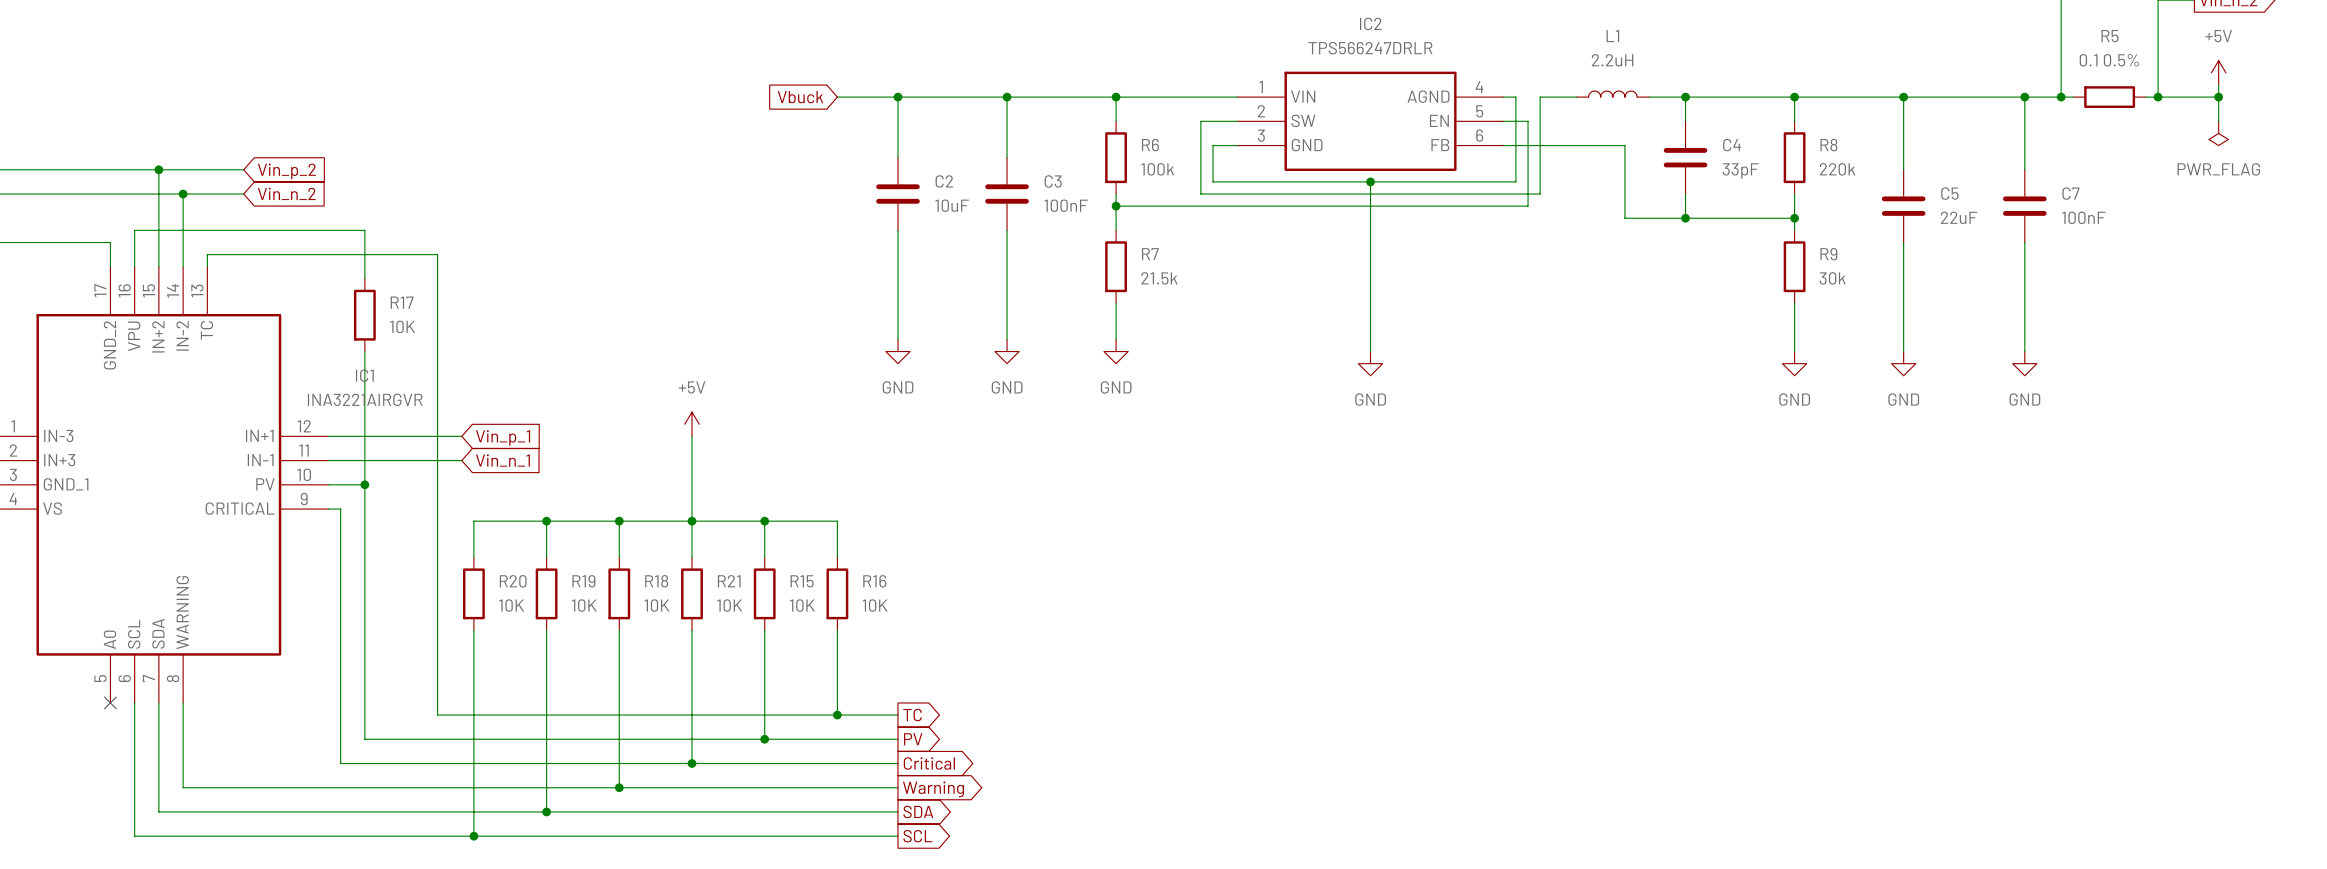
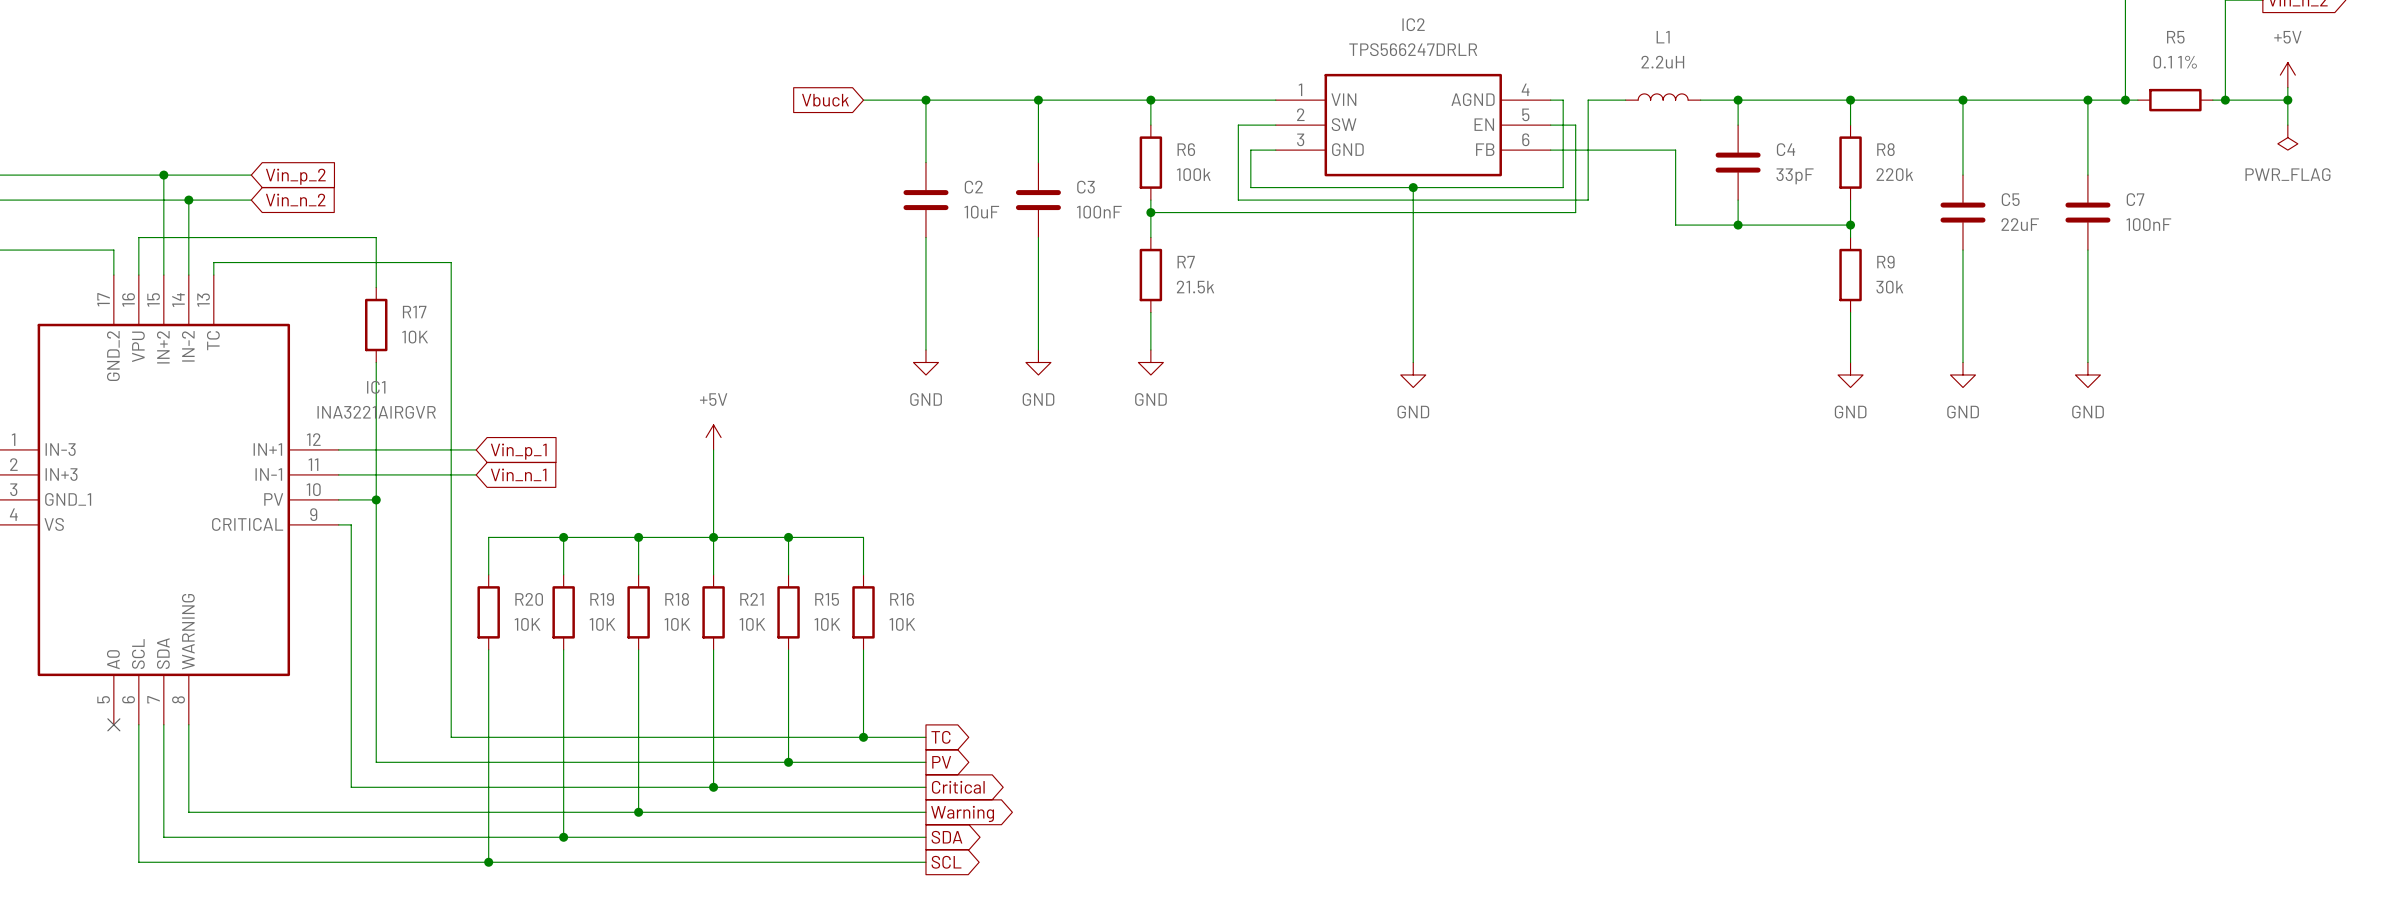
R5 value: 0.1 0.5% (2109, 60) -> 0.1 1% (2175, 62)

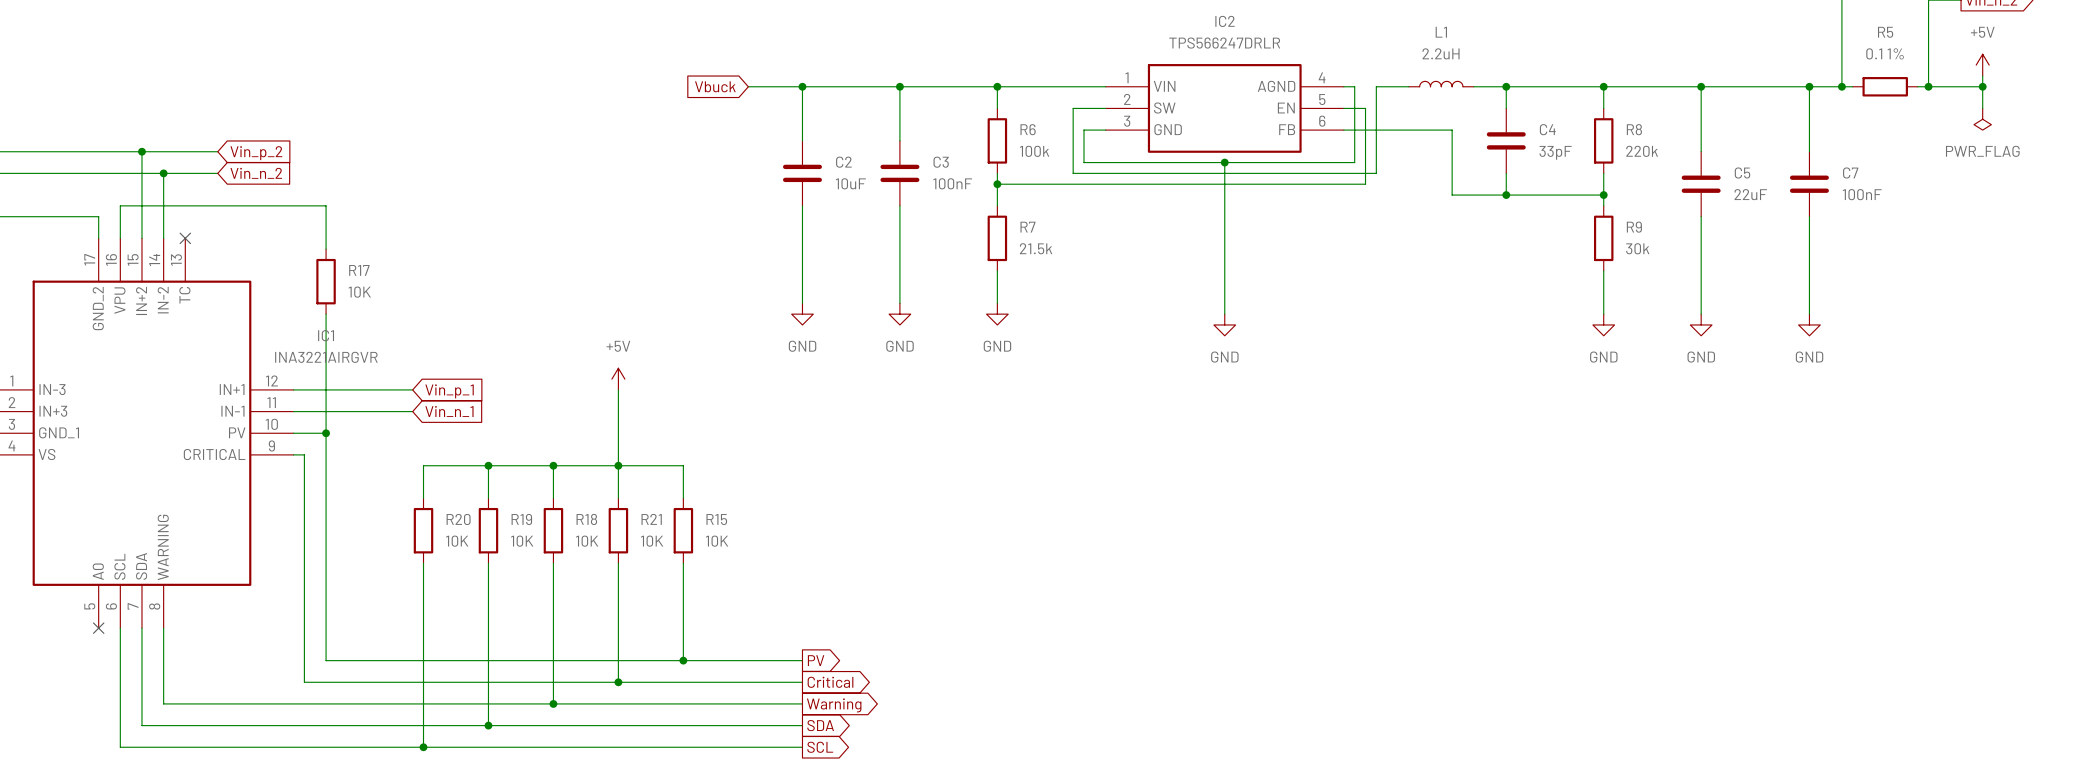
wire: (213, 275) (213, 262) (451, 262) (451, 737) (925, 737) -> none
no-connect mark: none -> (185, 238)
wire: (788, 537) (863, 537) (863, 574) -> none
junction: (788, 537) -> none
R16: 10K (863, 612) -> none
wire: (863, 649) (863, 737) -> none
junction: (863, 737) -> none
global label: TC (940, 737) -> none

